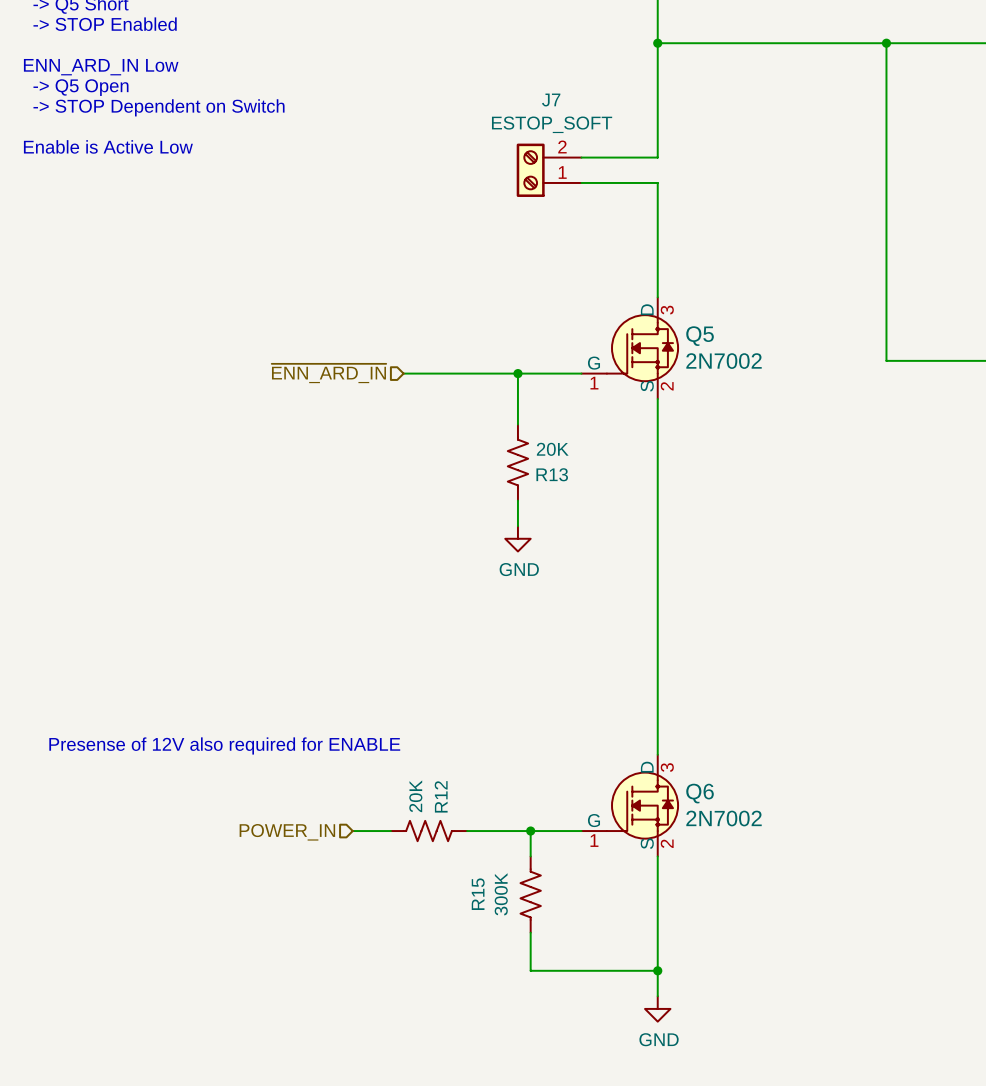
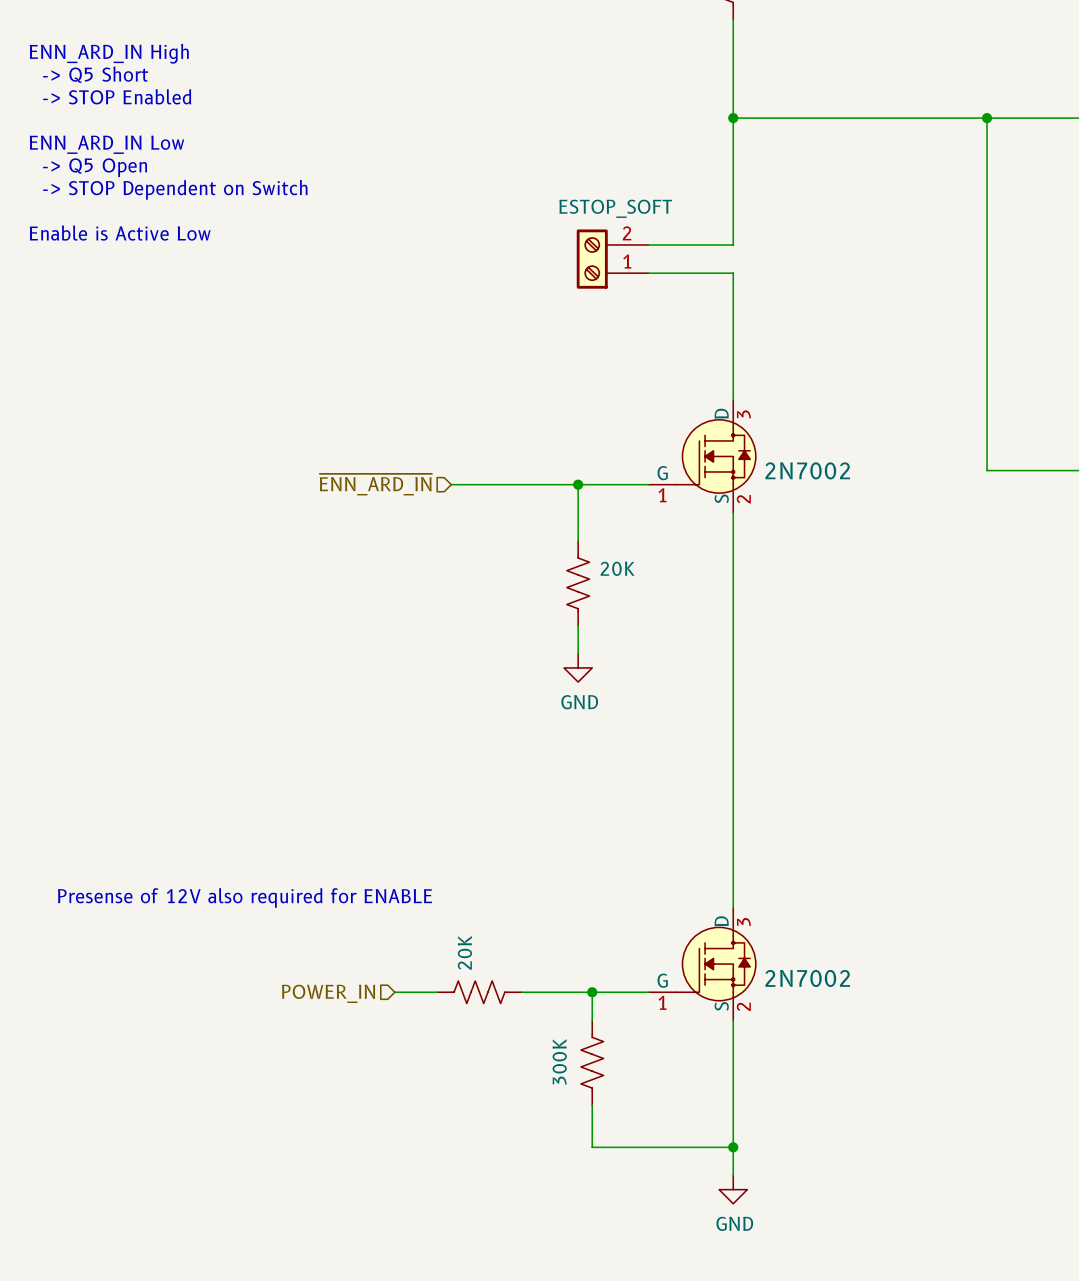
J7 name: J7 (551, 100) -> none
Q5 name: Q5 (700, 336) -> none
R13 name: R13 (552, 474) -> none
Q6 name: Q6 (700, 793) -> none
R12 name: R12 (441, 796) -> none
R15 name: R15 (478, 894) -> none

